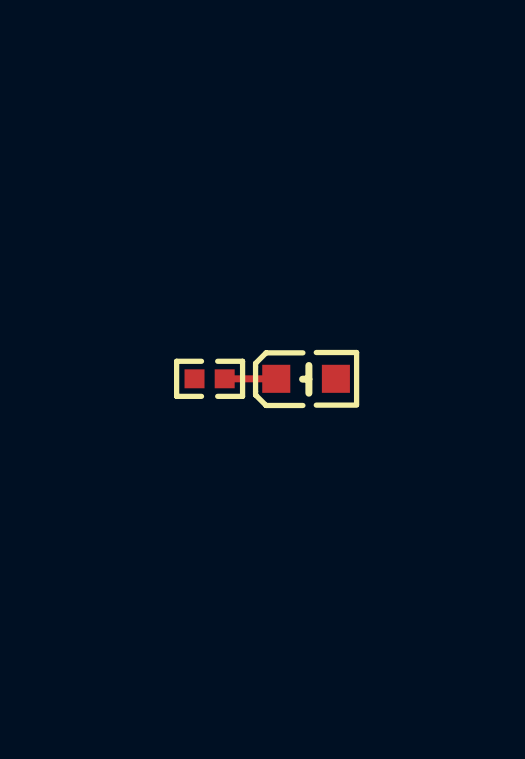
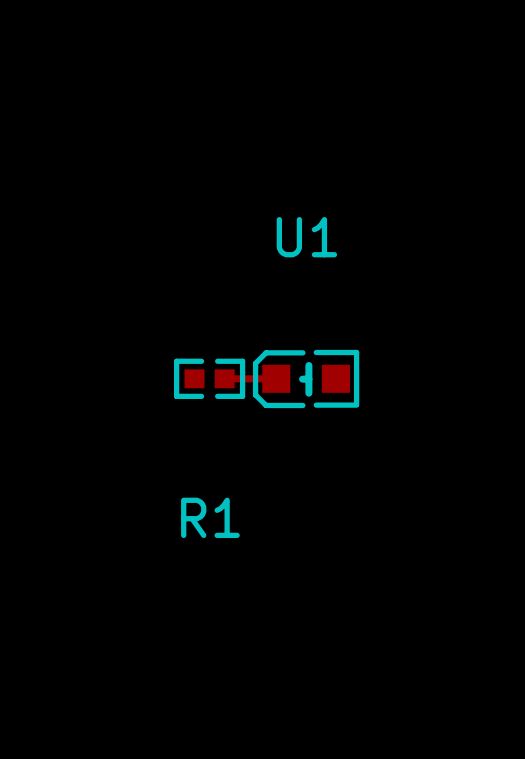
U1 name: none -> U1 (306, 237)
R1 name: none -> R1 (210, 517)

